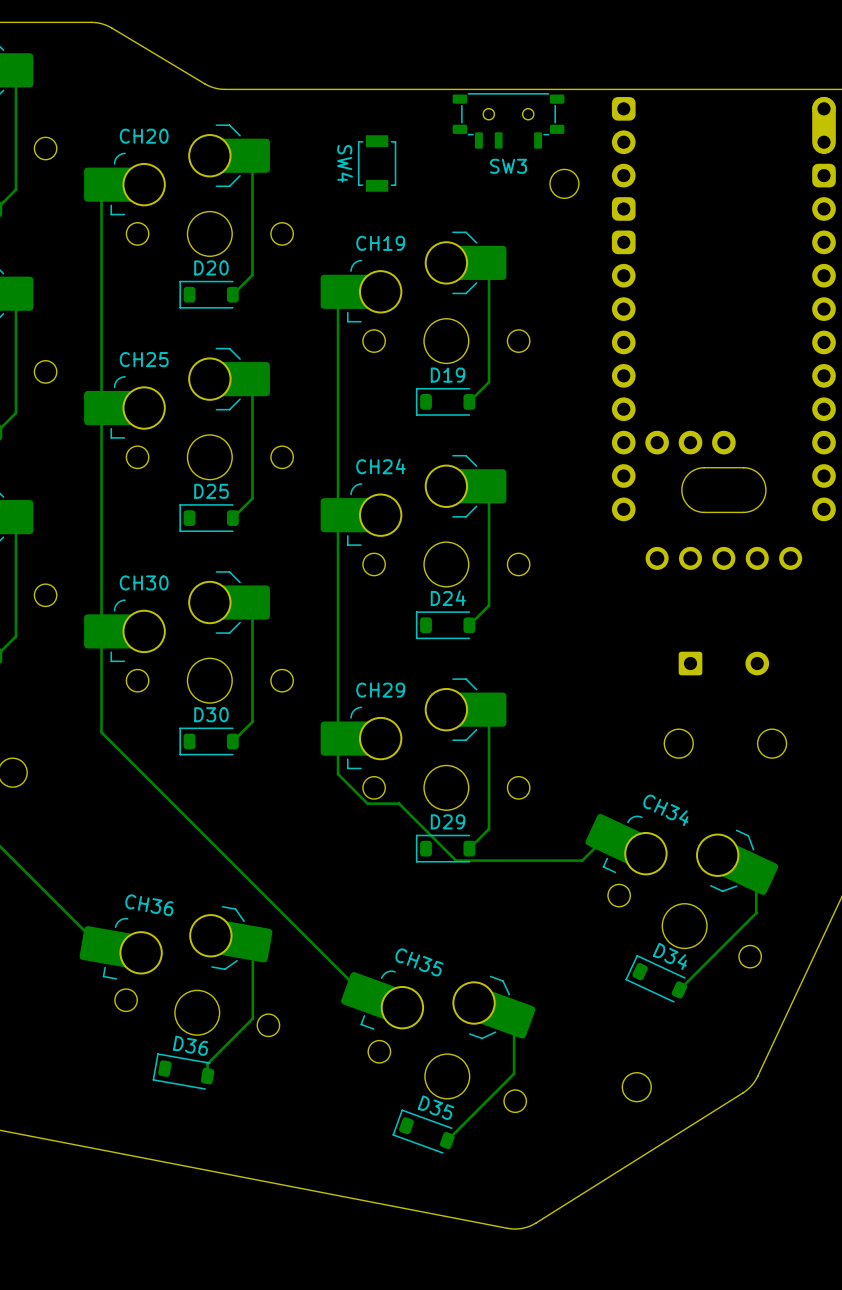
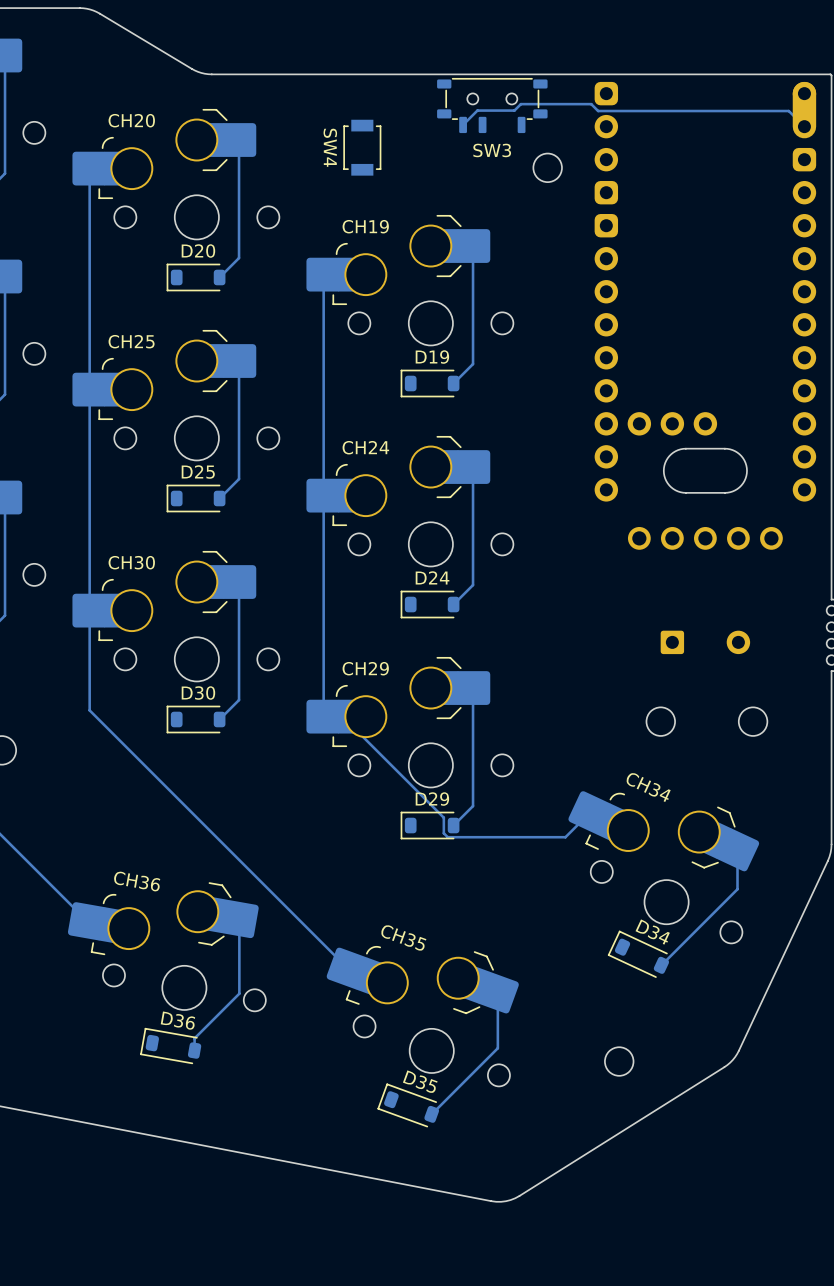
track: none -> (463, 124) (477, 110) (514, 110) (520, 104) (591, 104) (598, 111) (788, 111) (804, 126)
track: (338, 738) (338, 774) (367, 803) (399, 803) (456, 860) (582, 860) -> (323, 716) (342, 716) (443, 817) (443, 833) (447, 837) (565, 837)

